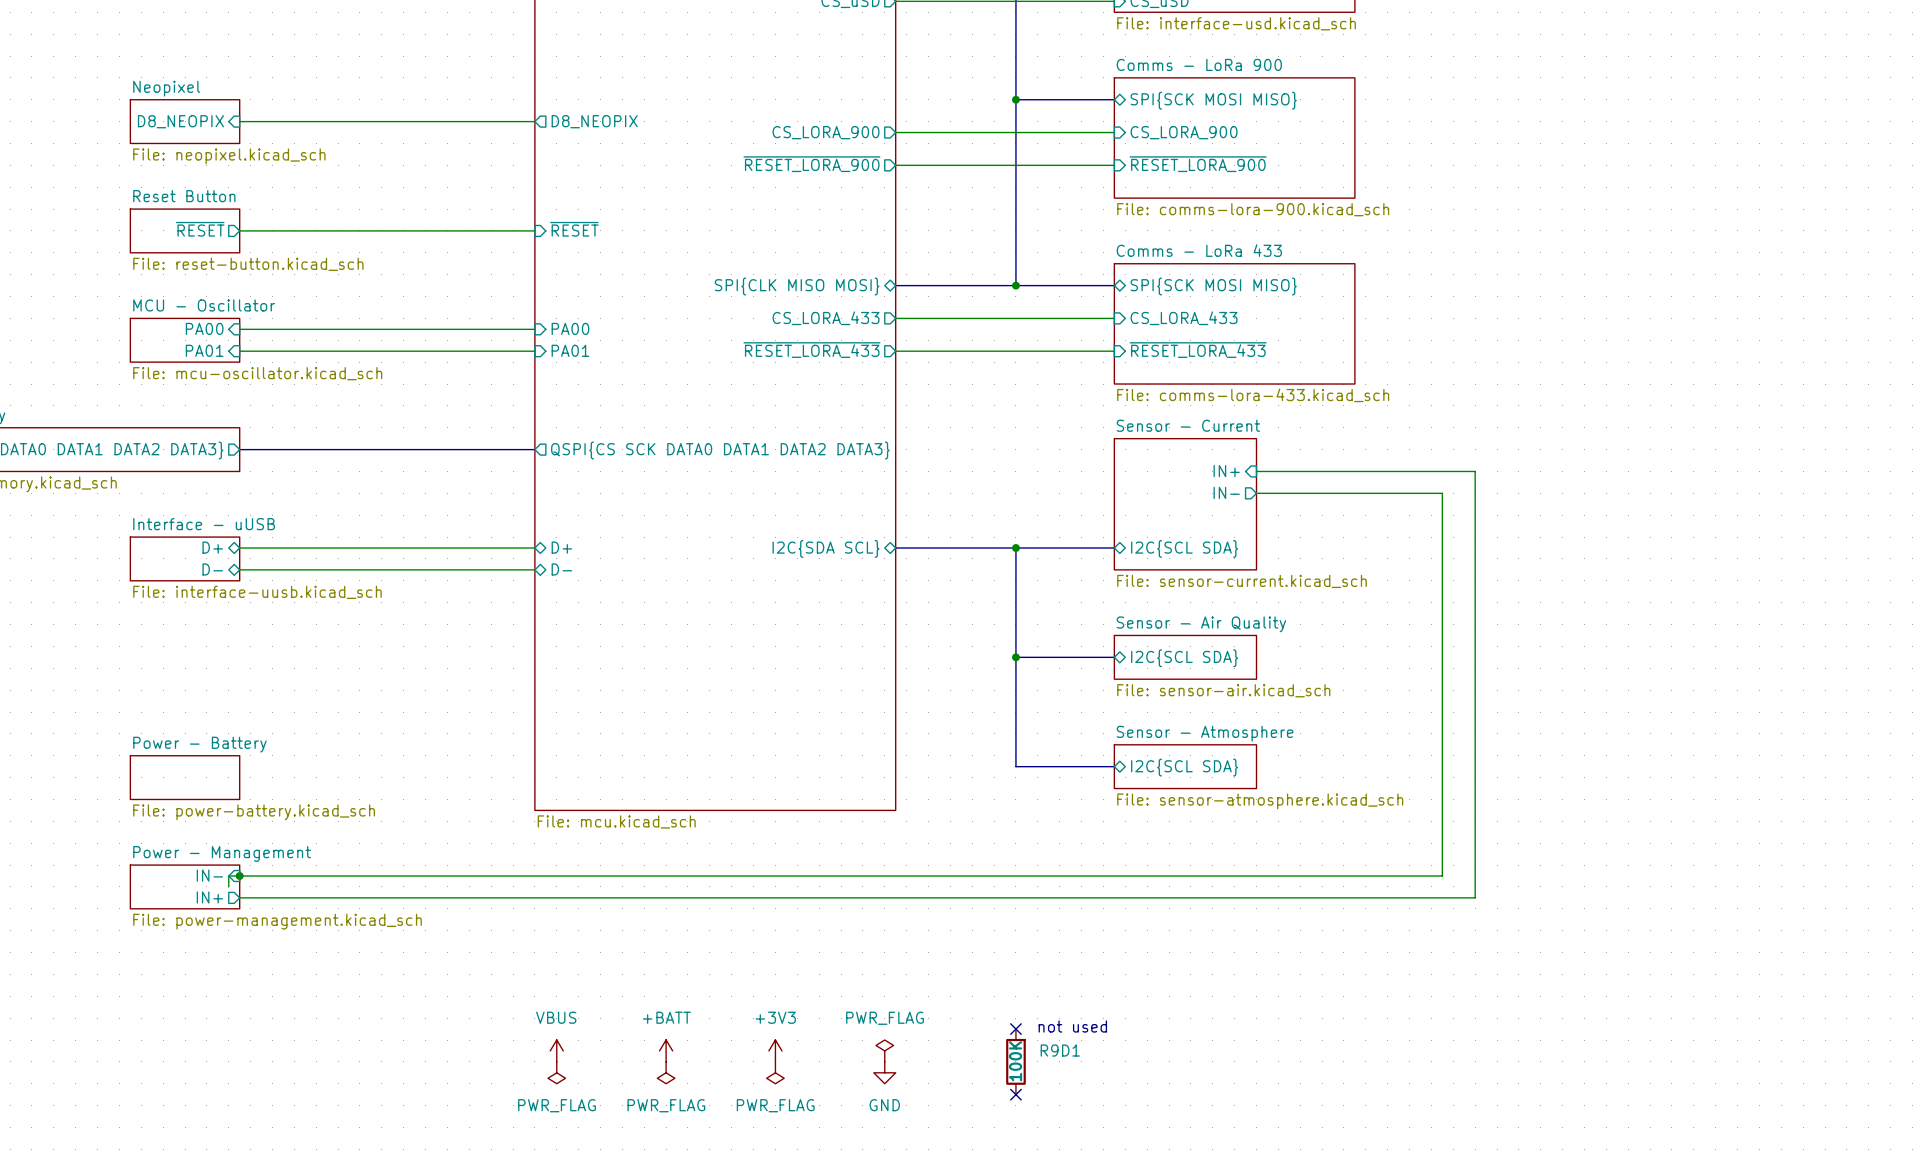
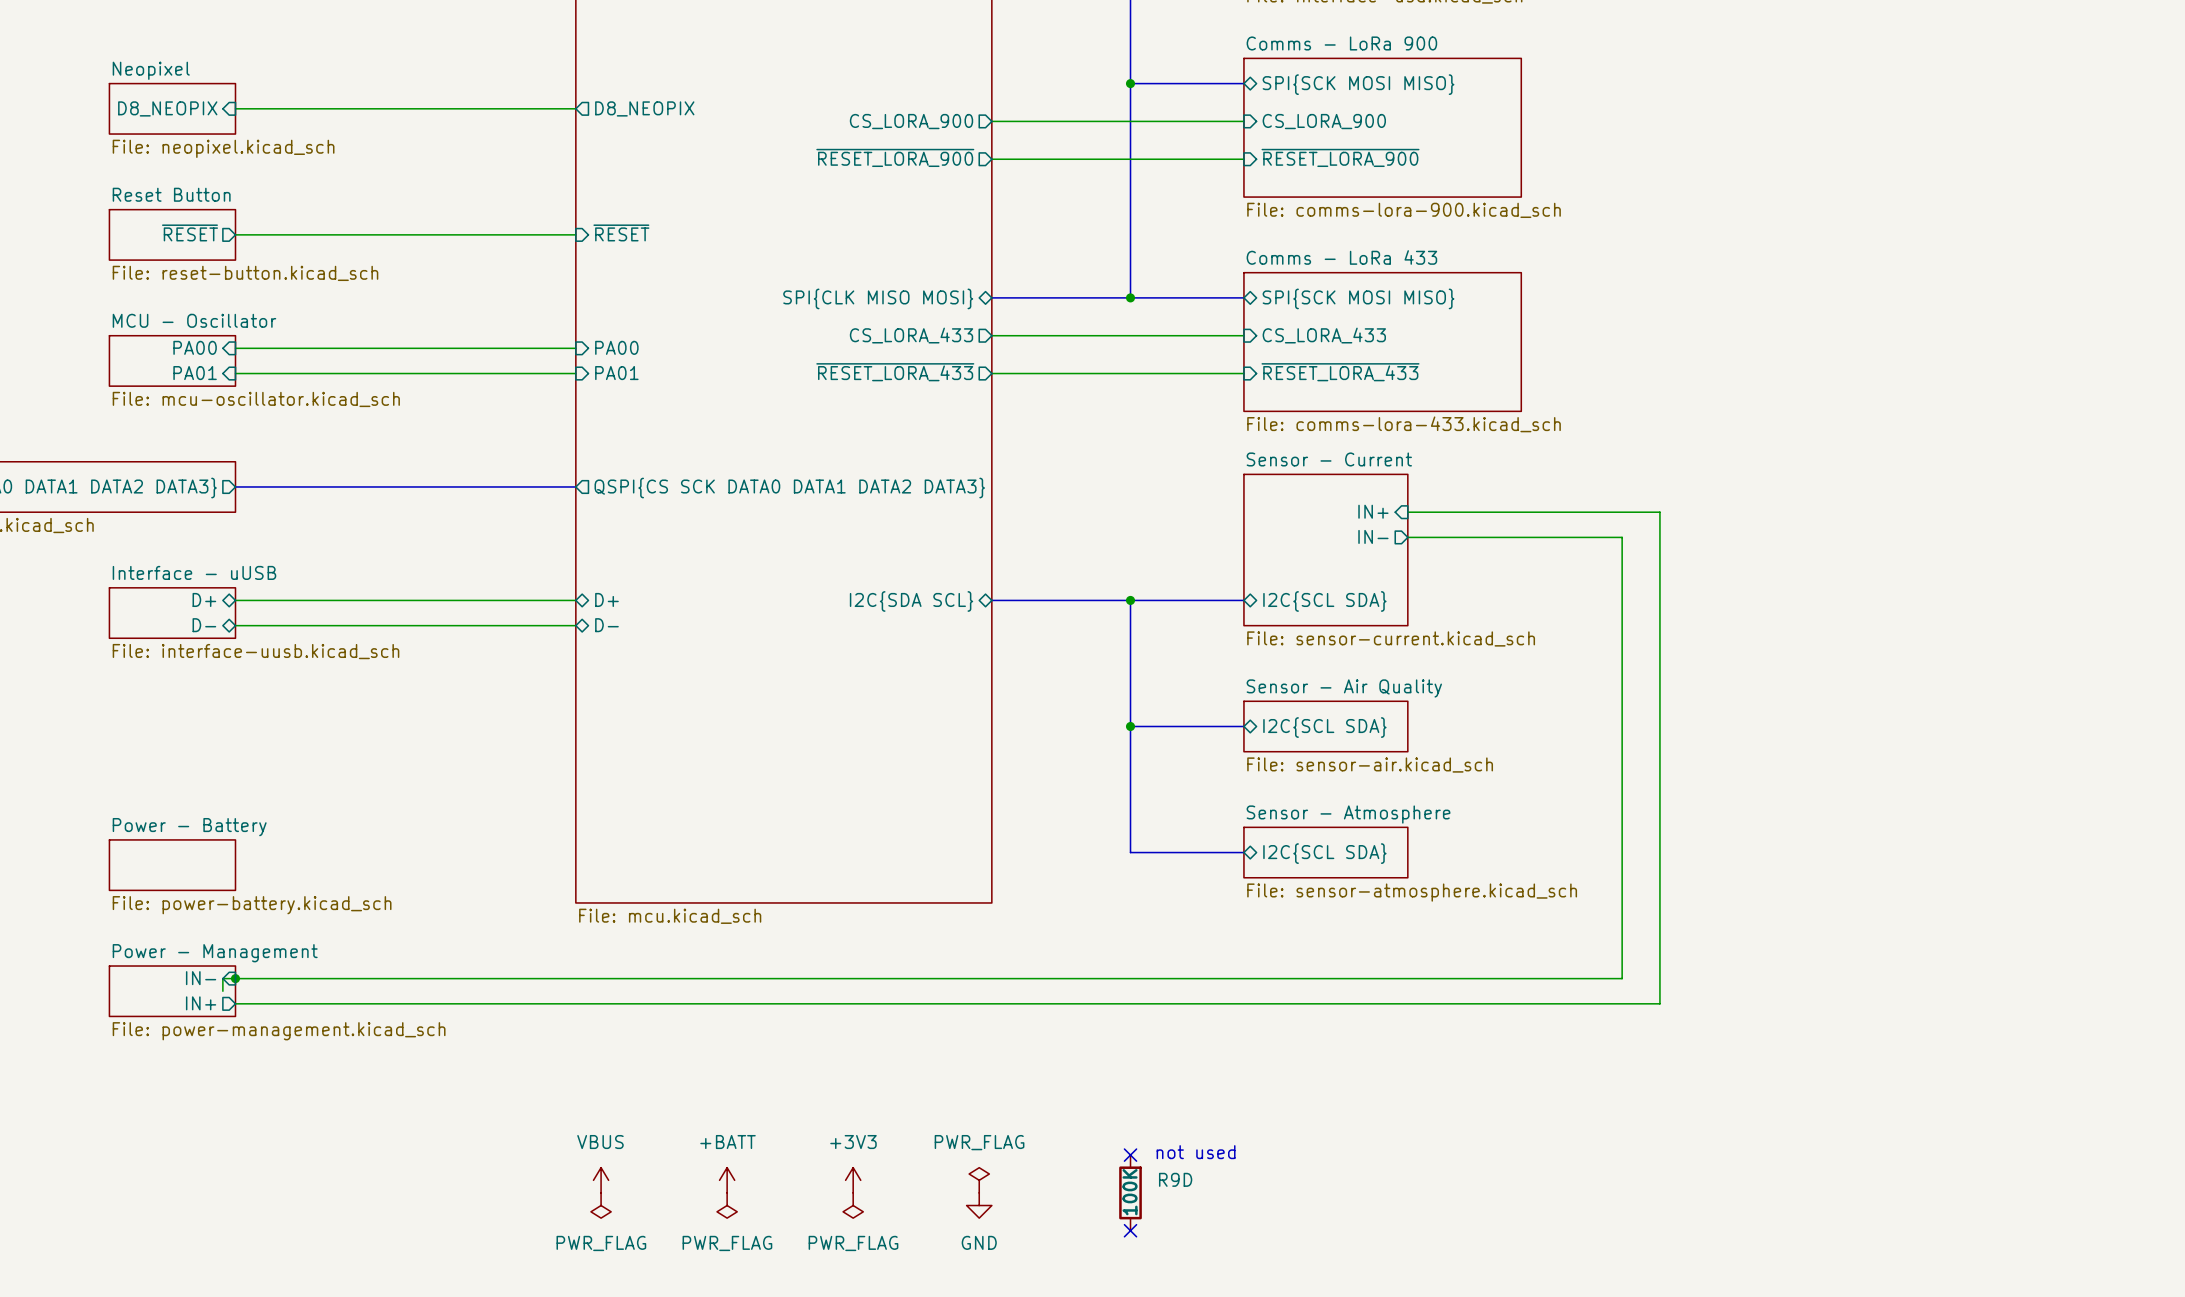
R9D1 name: R9D1 (1060, 1050) -> R9D (1175, 1179)

